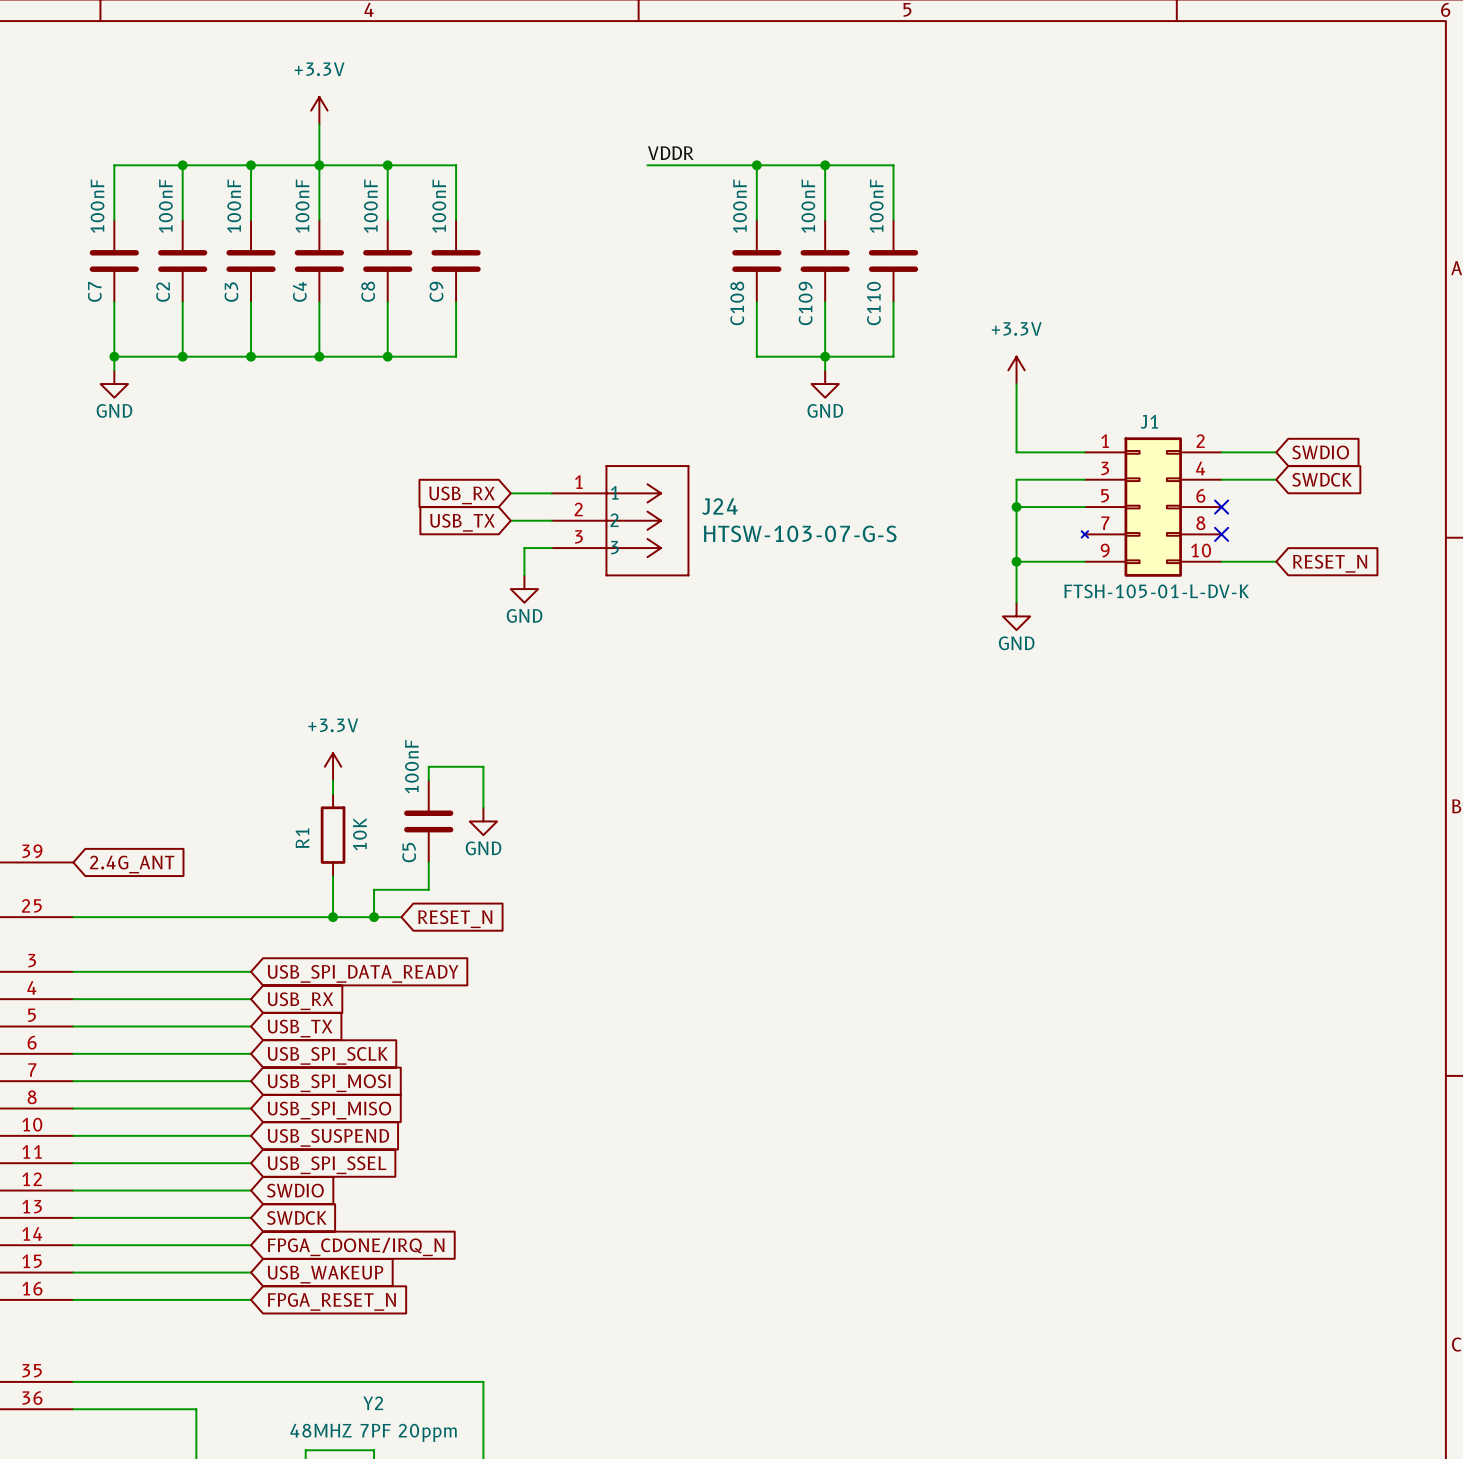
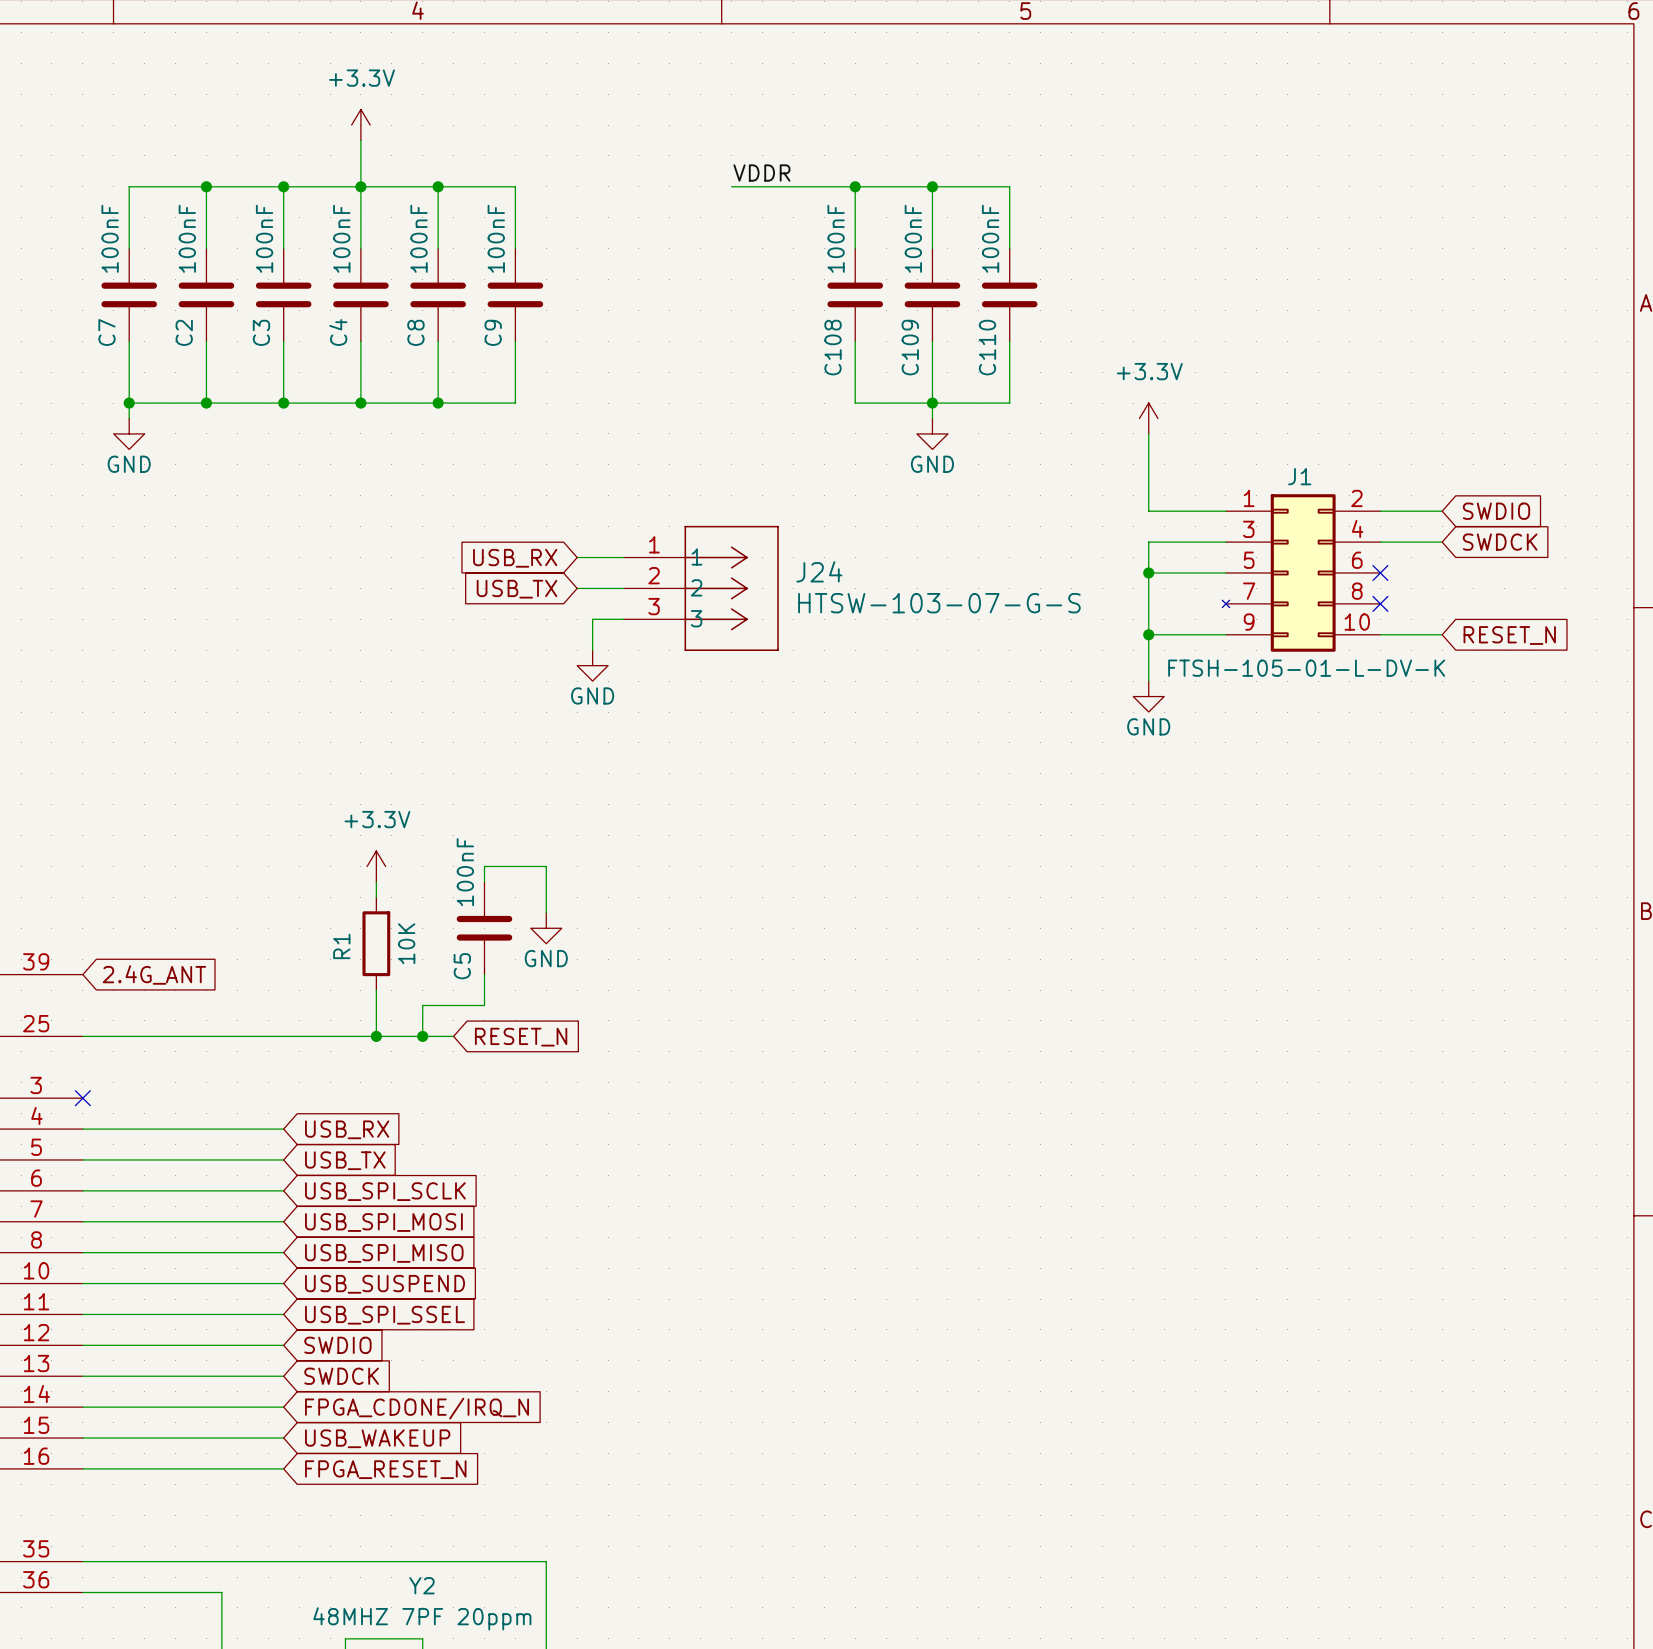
wire: (73, 971) (251, 971) -> none
no-connect mark: none -> (82, 1098)
global label: USB_SPI_DATA_READY (363, 973) -> none

